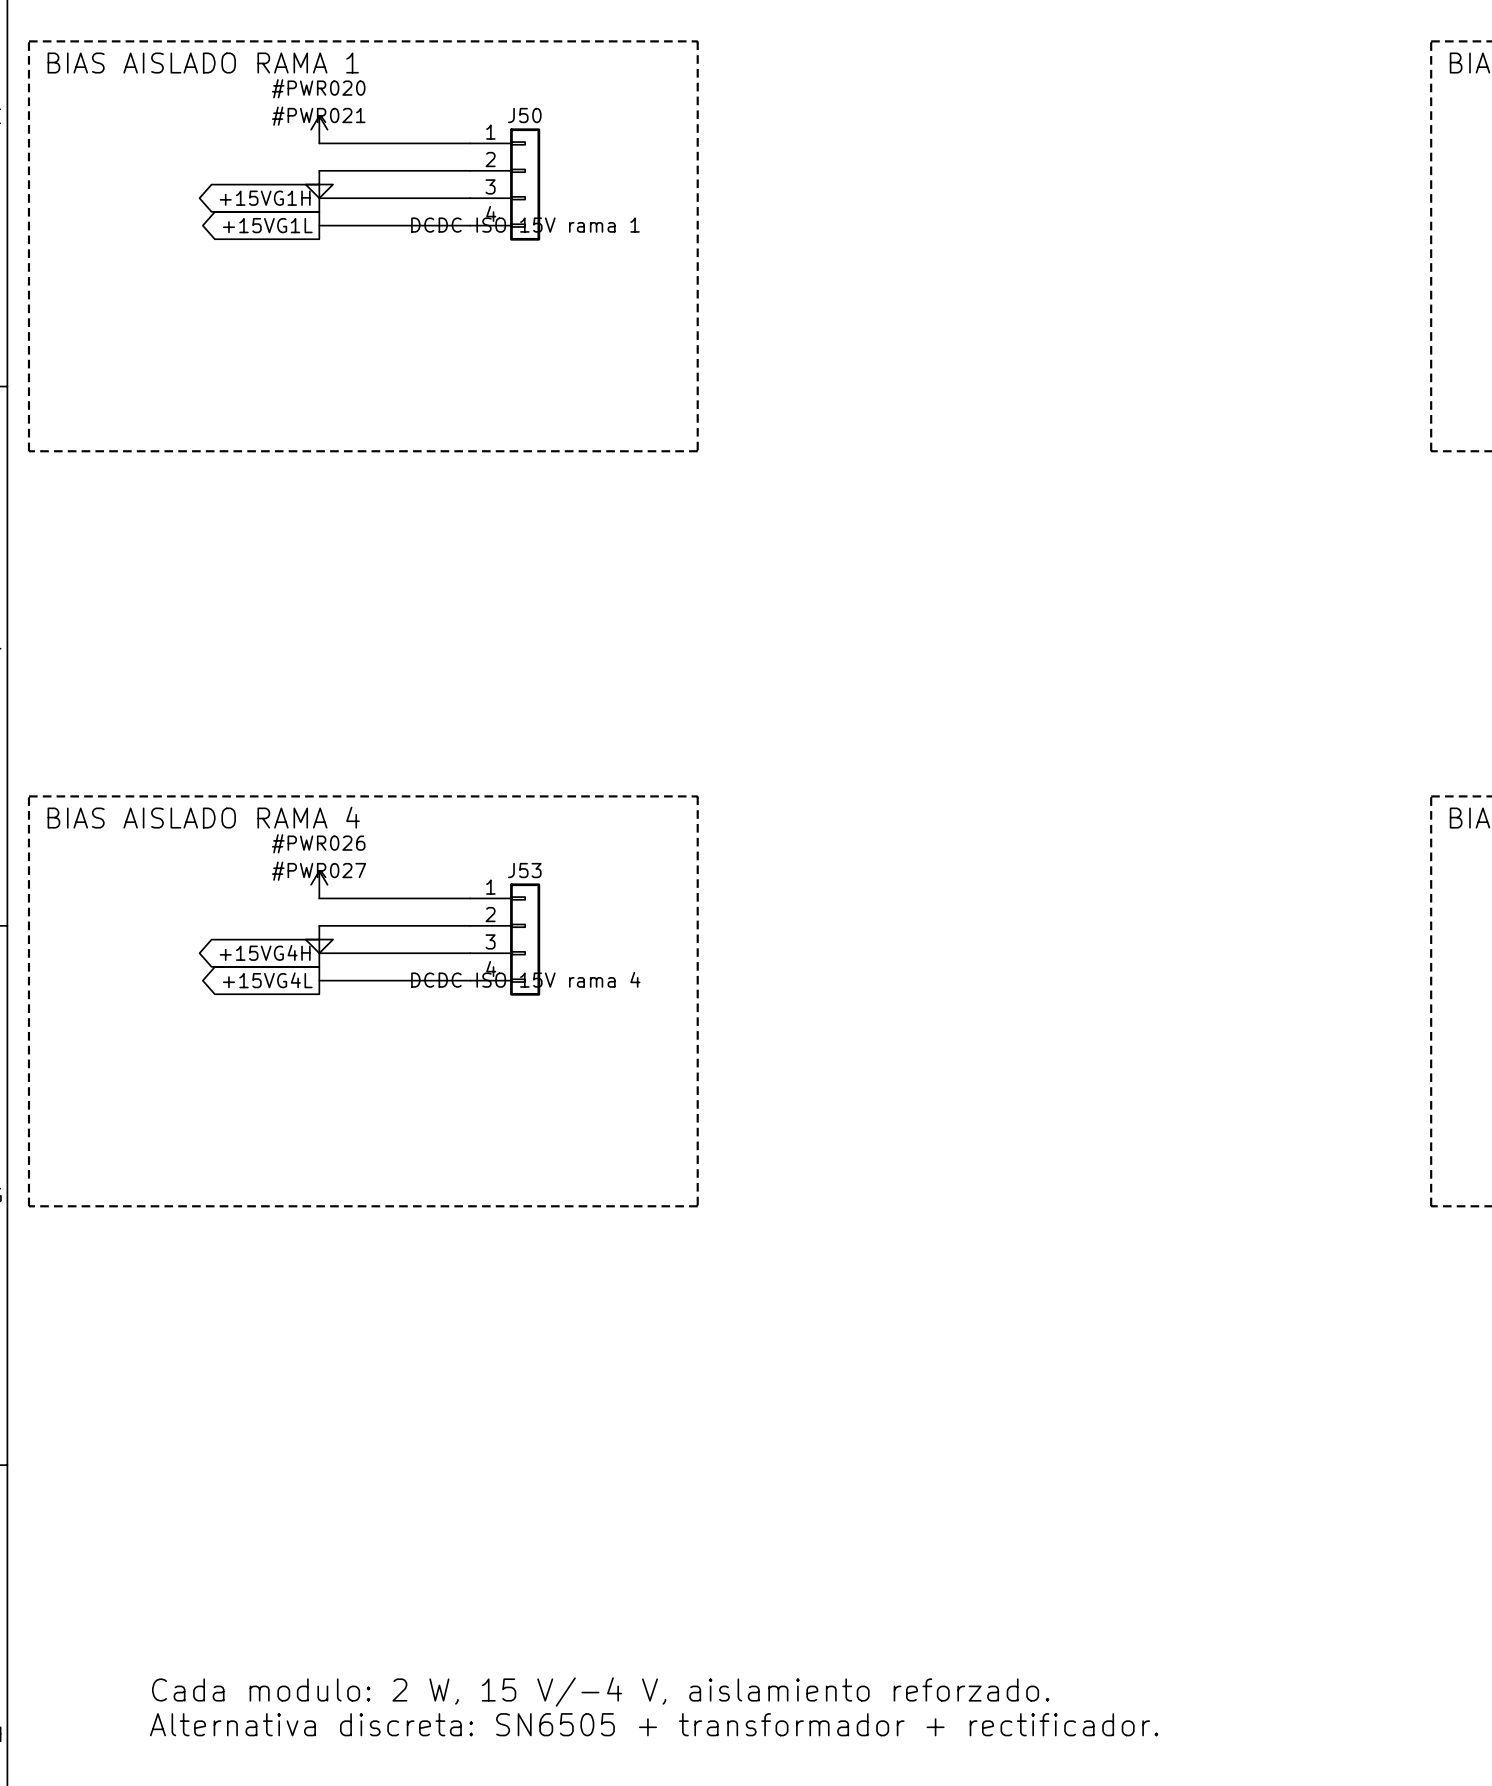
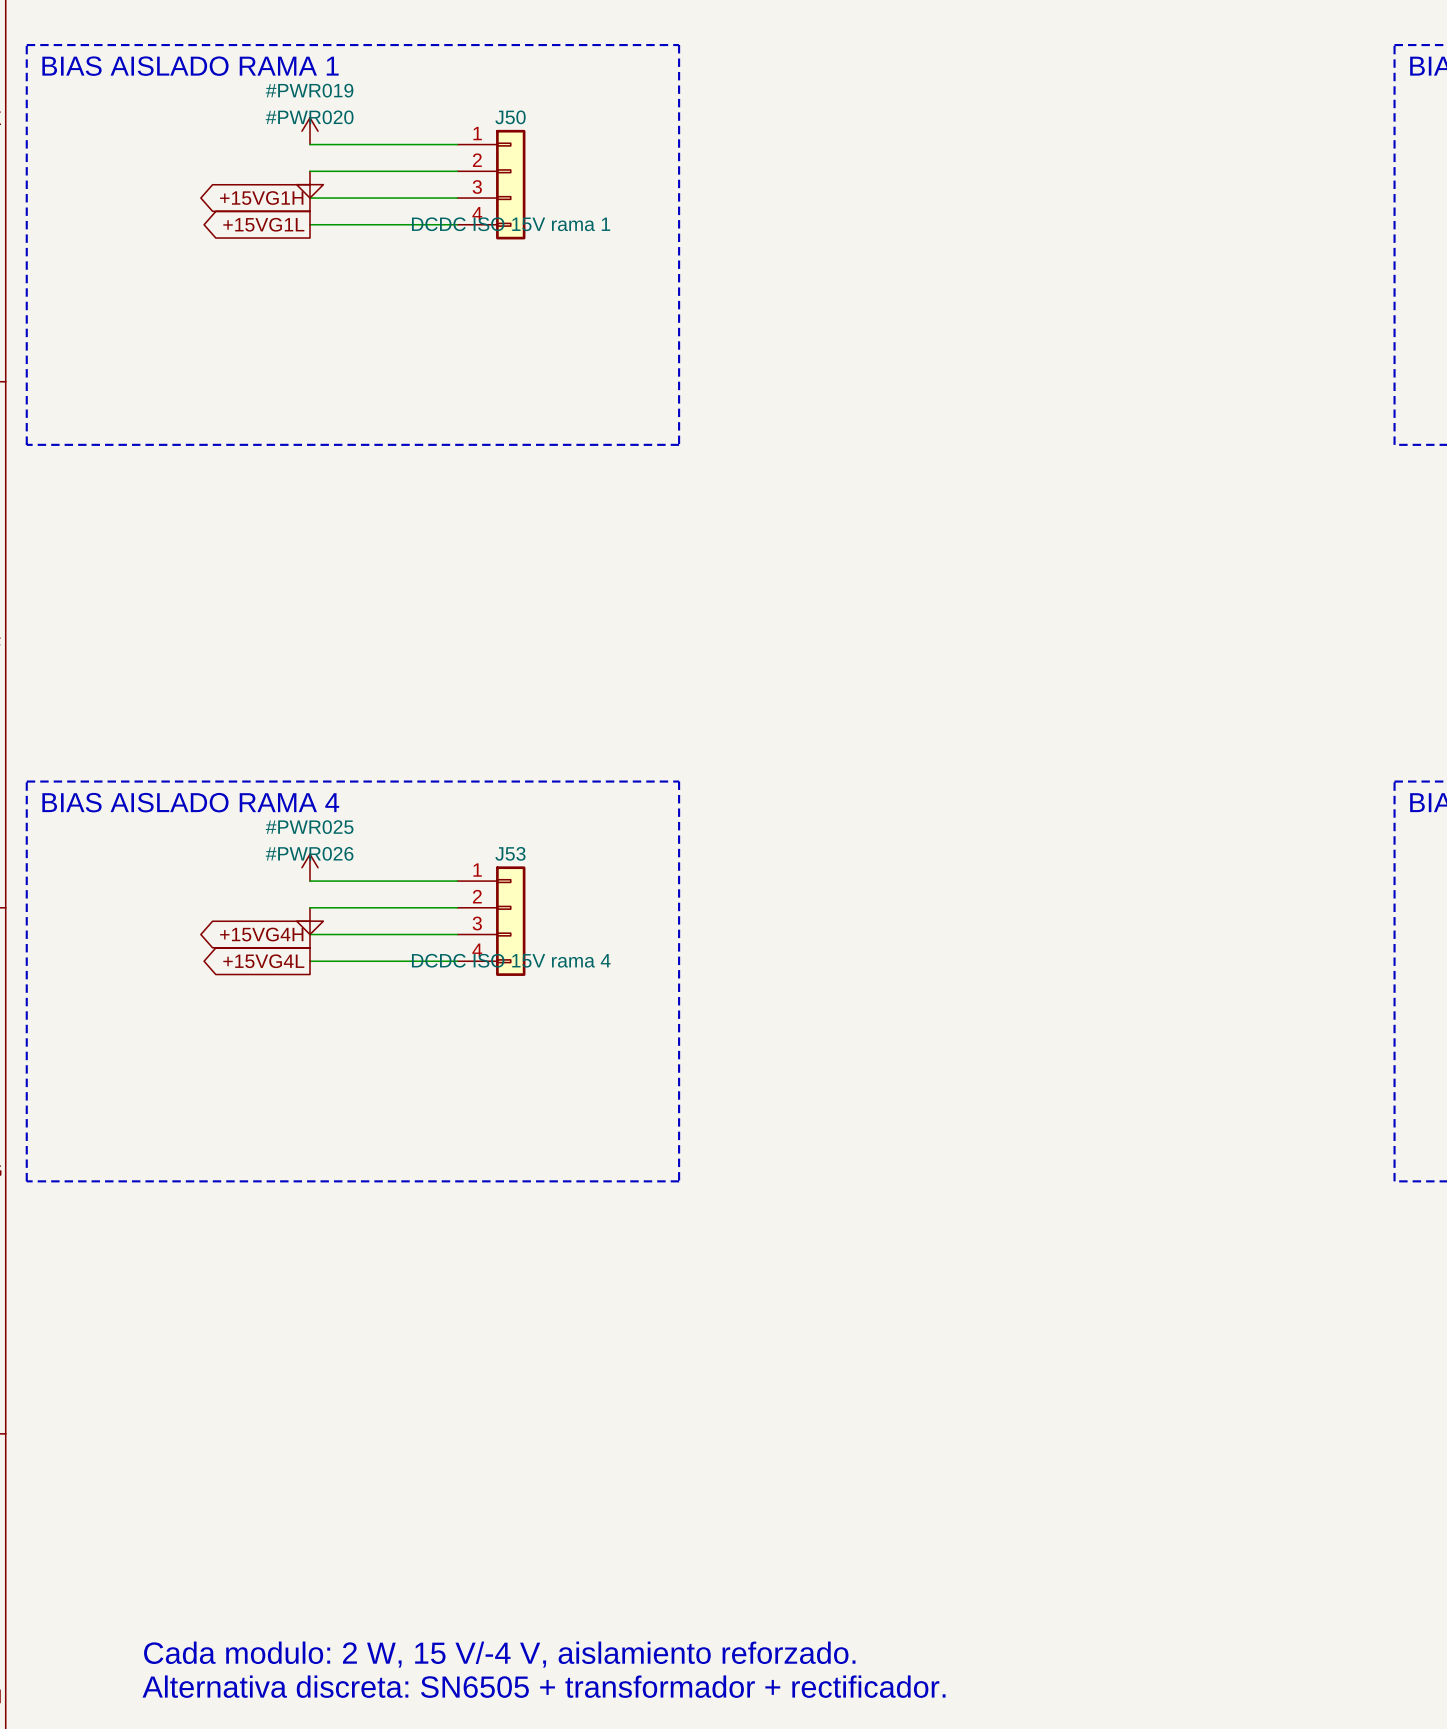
#PWR020 name: #PWR020 (318, 88) -> #PWR019 (309, 90)
#PWR021 name: #PWR021 (318, 116) -> #PWR020 (309, 117)
#PWR026 name: #PWR026 (318, 843) -> #PWR025 (309, 827)
#PWR027 name: #PWR027 (319, 871) -> #PWR026 (309, 853)

